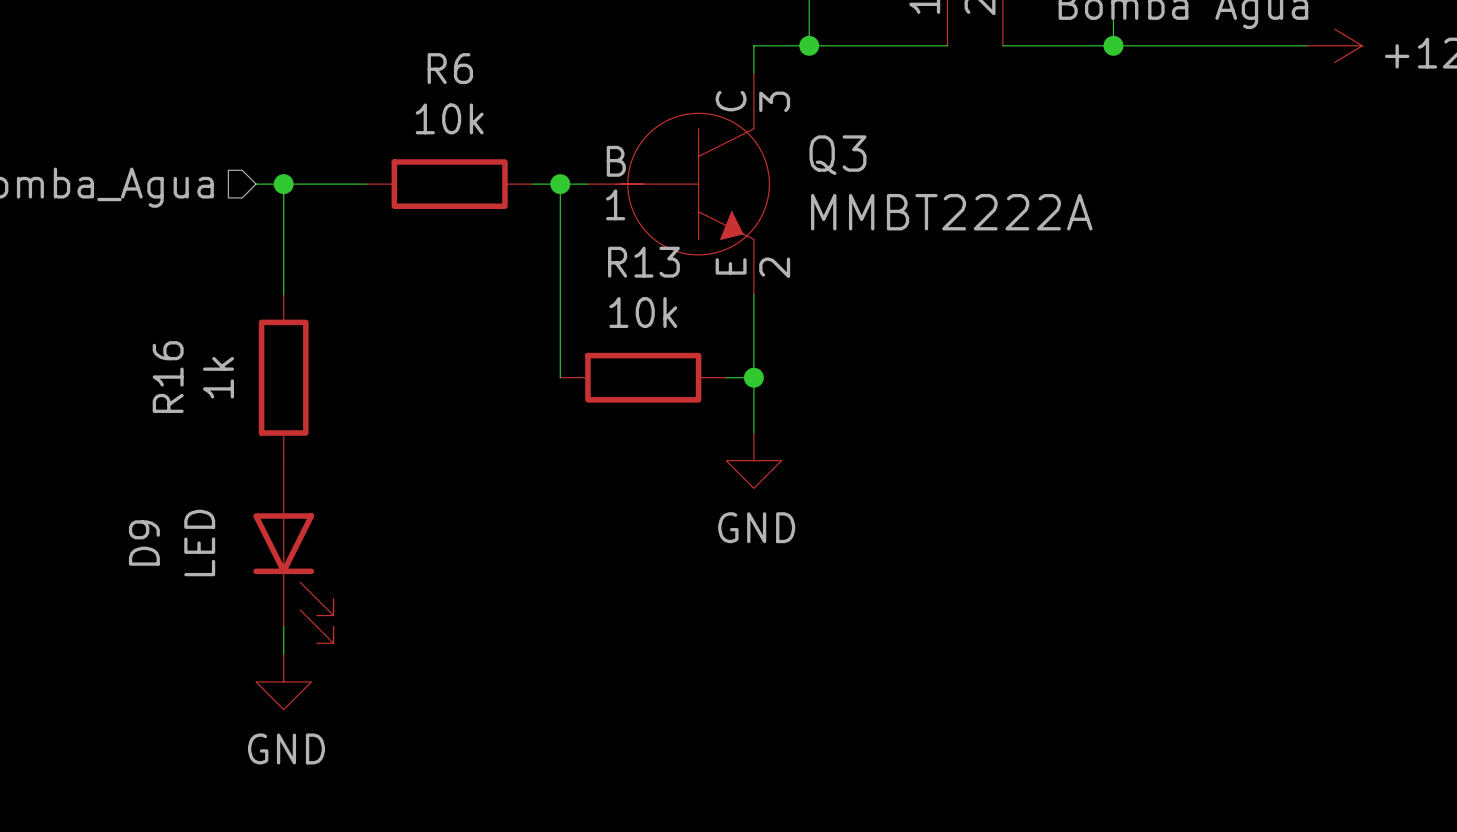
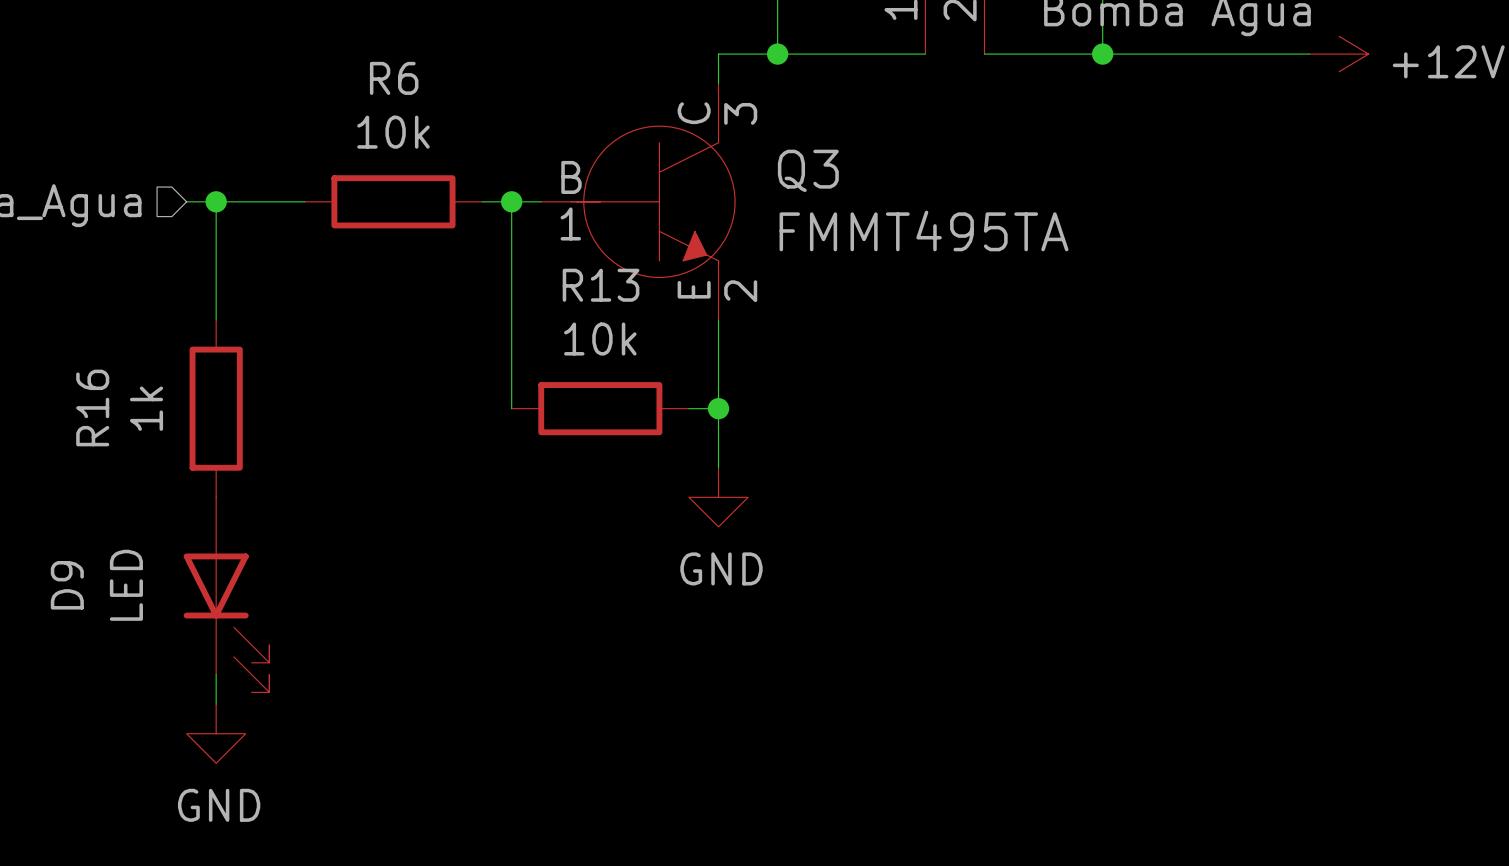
Q3 value: MMBT2222A (951, 212) -> FMMT495TA (924, 230)

